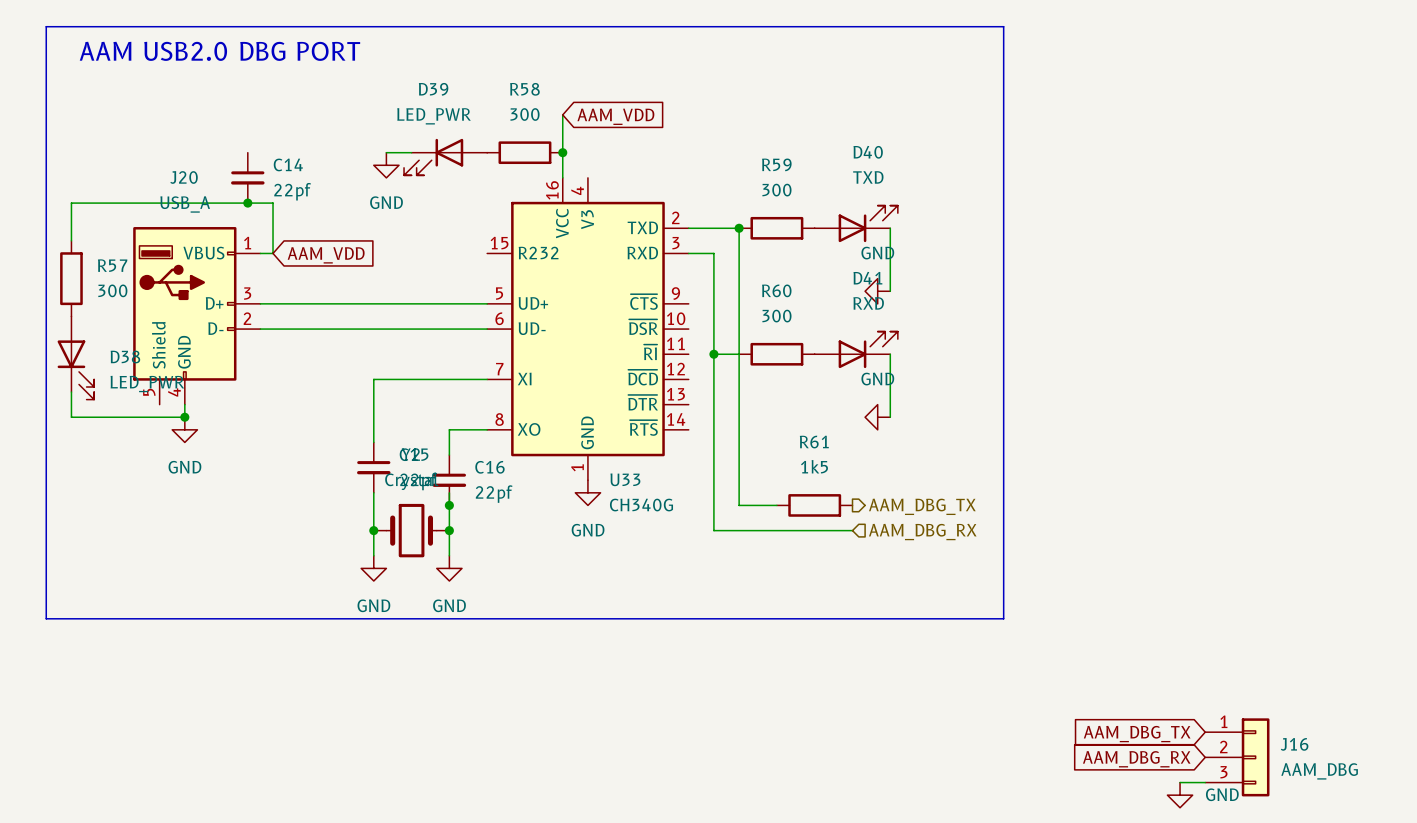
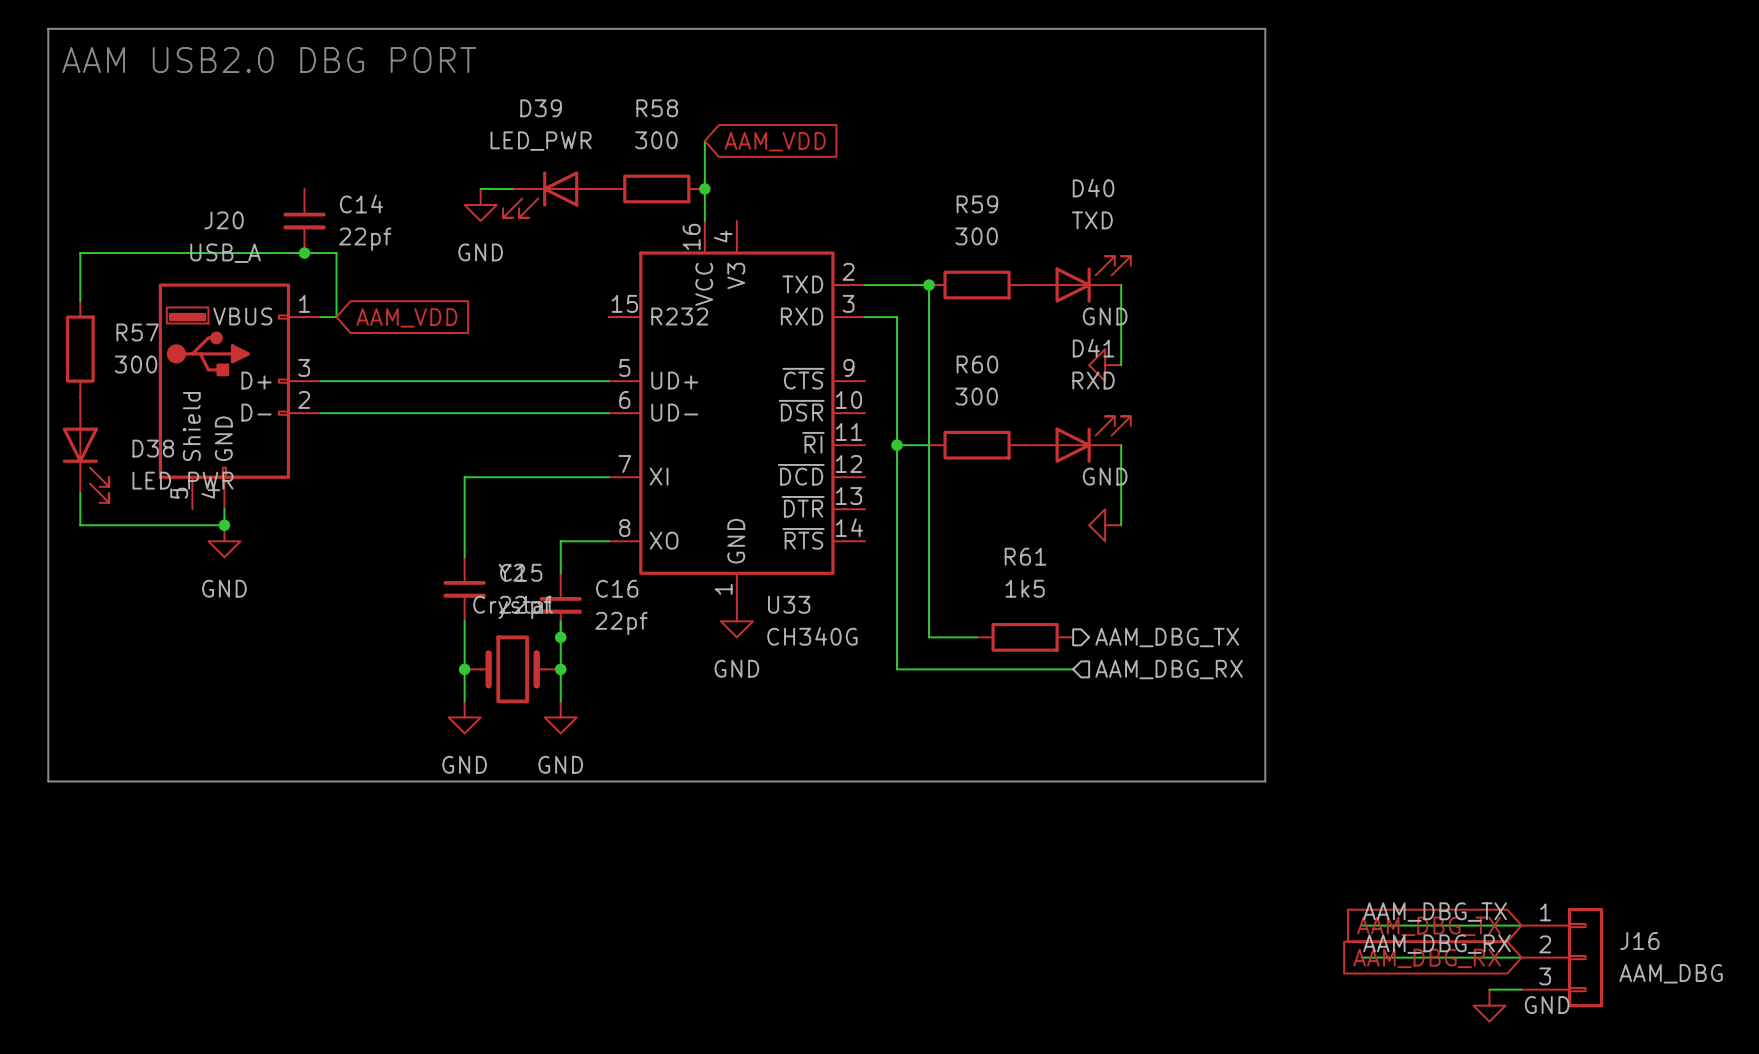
label: none -> AAM_DBG_TX (1435, 912)
wire: none -> (1361, 925) (1521, 925)
label: none -> AAM_DBG_RX (1436, 944)
wire: none -> (1361, 957) (1521, 957)

